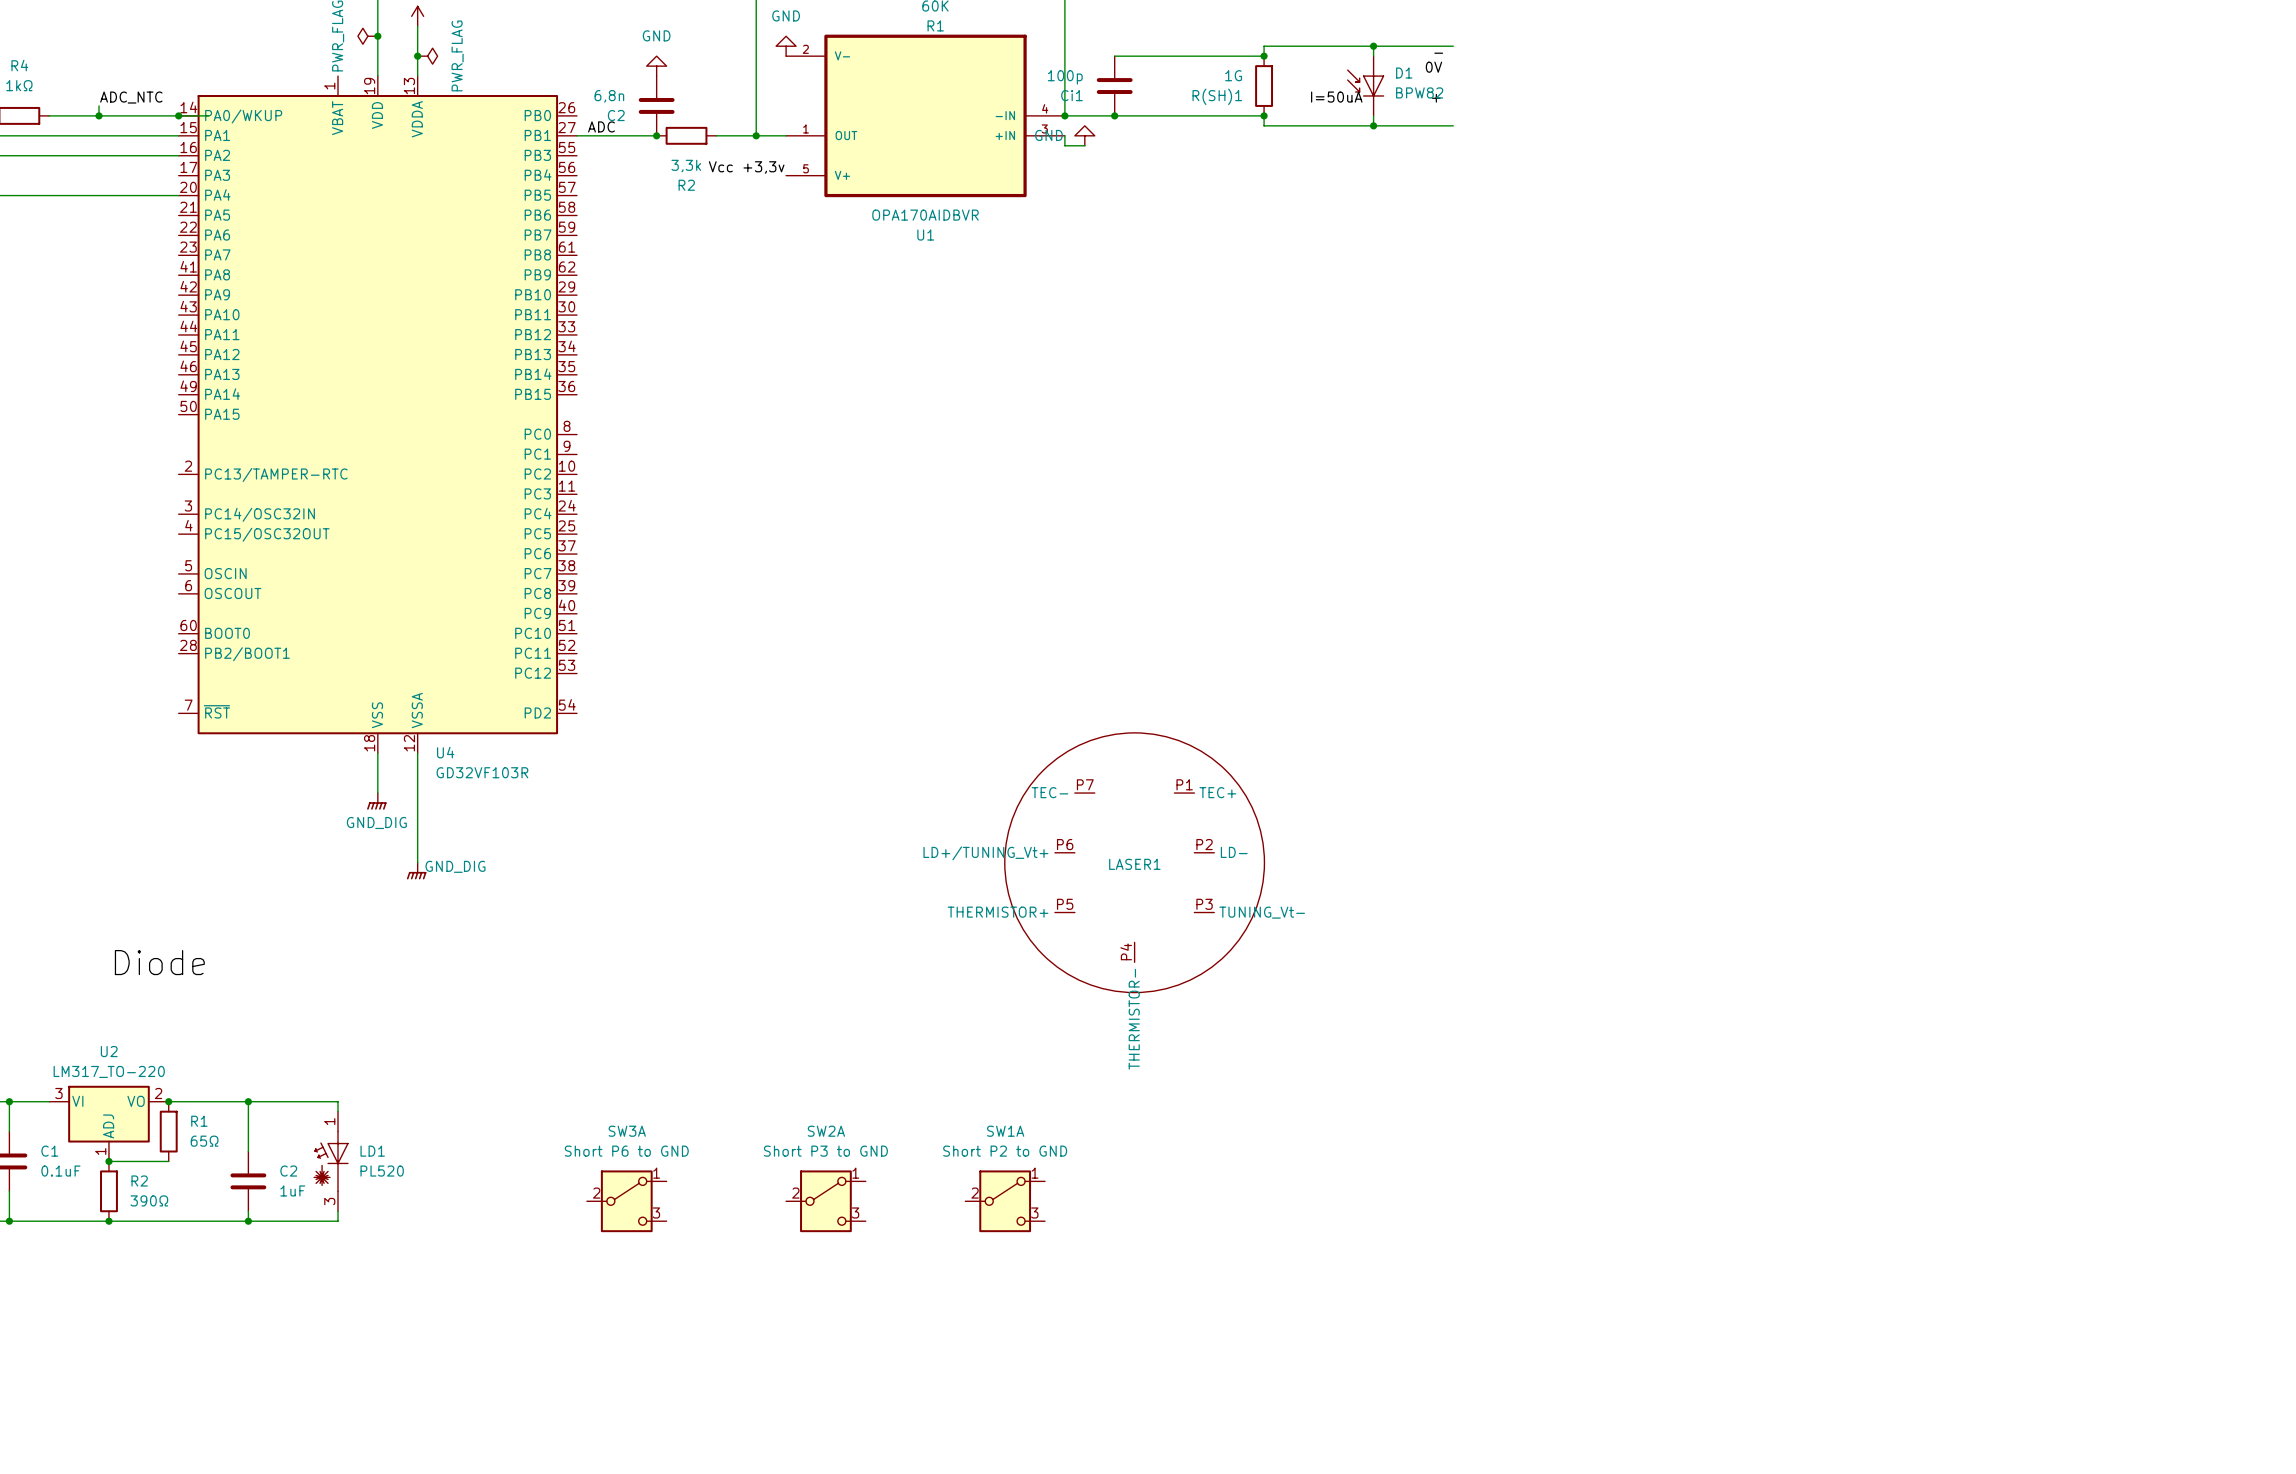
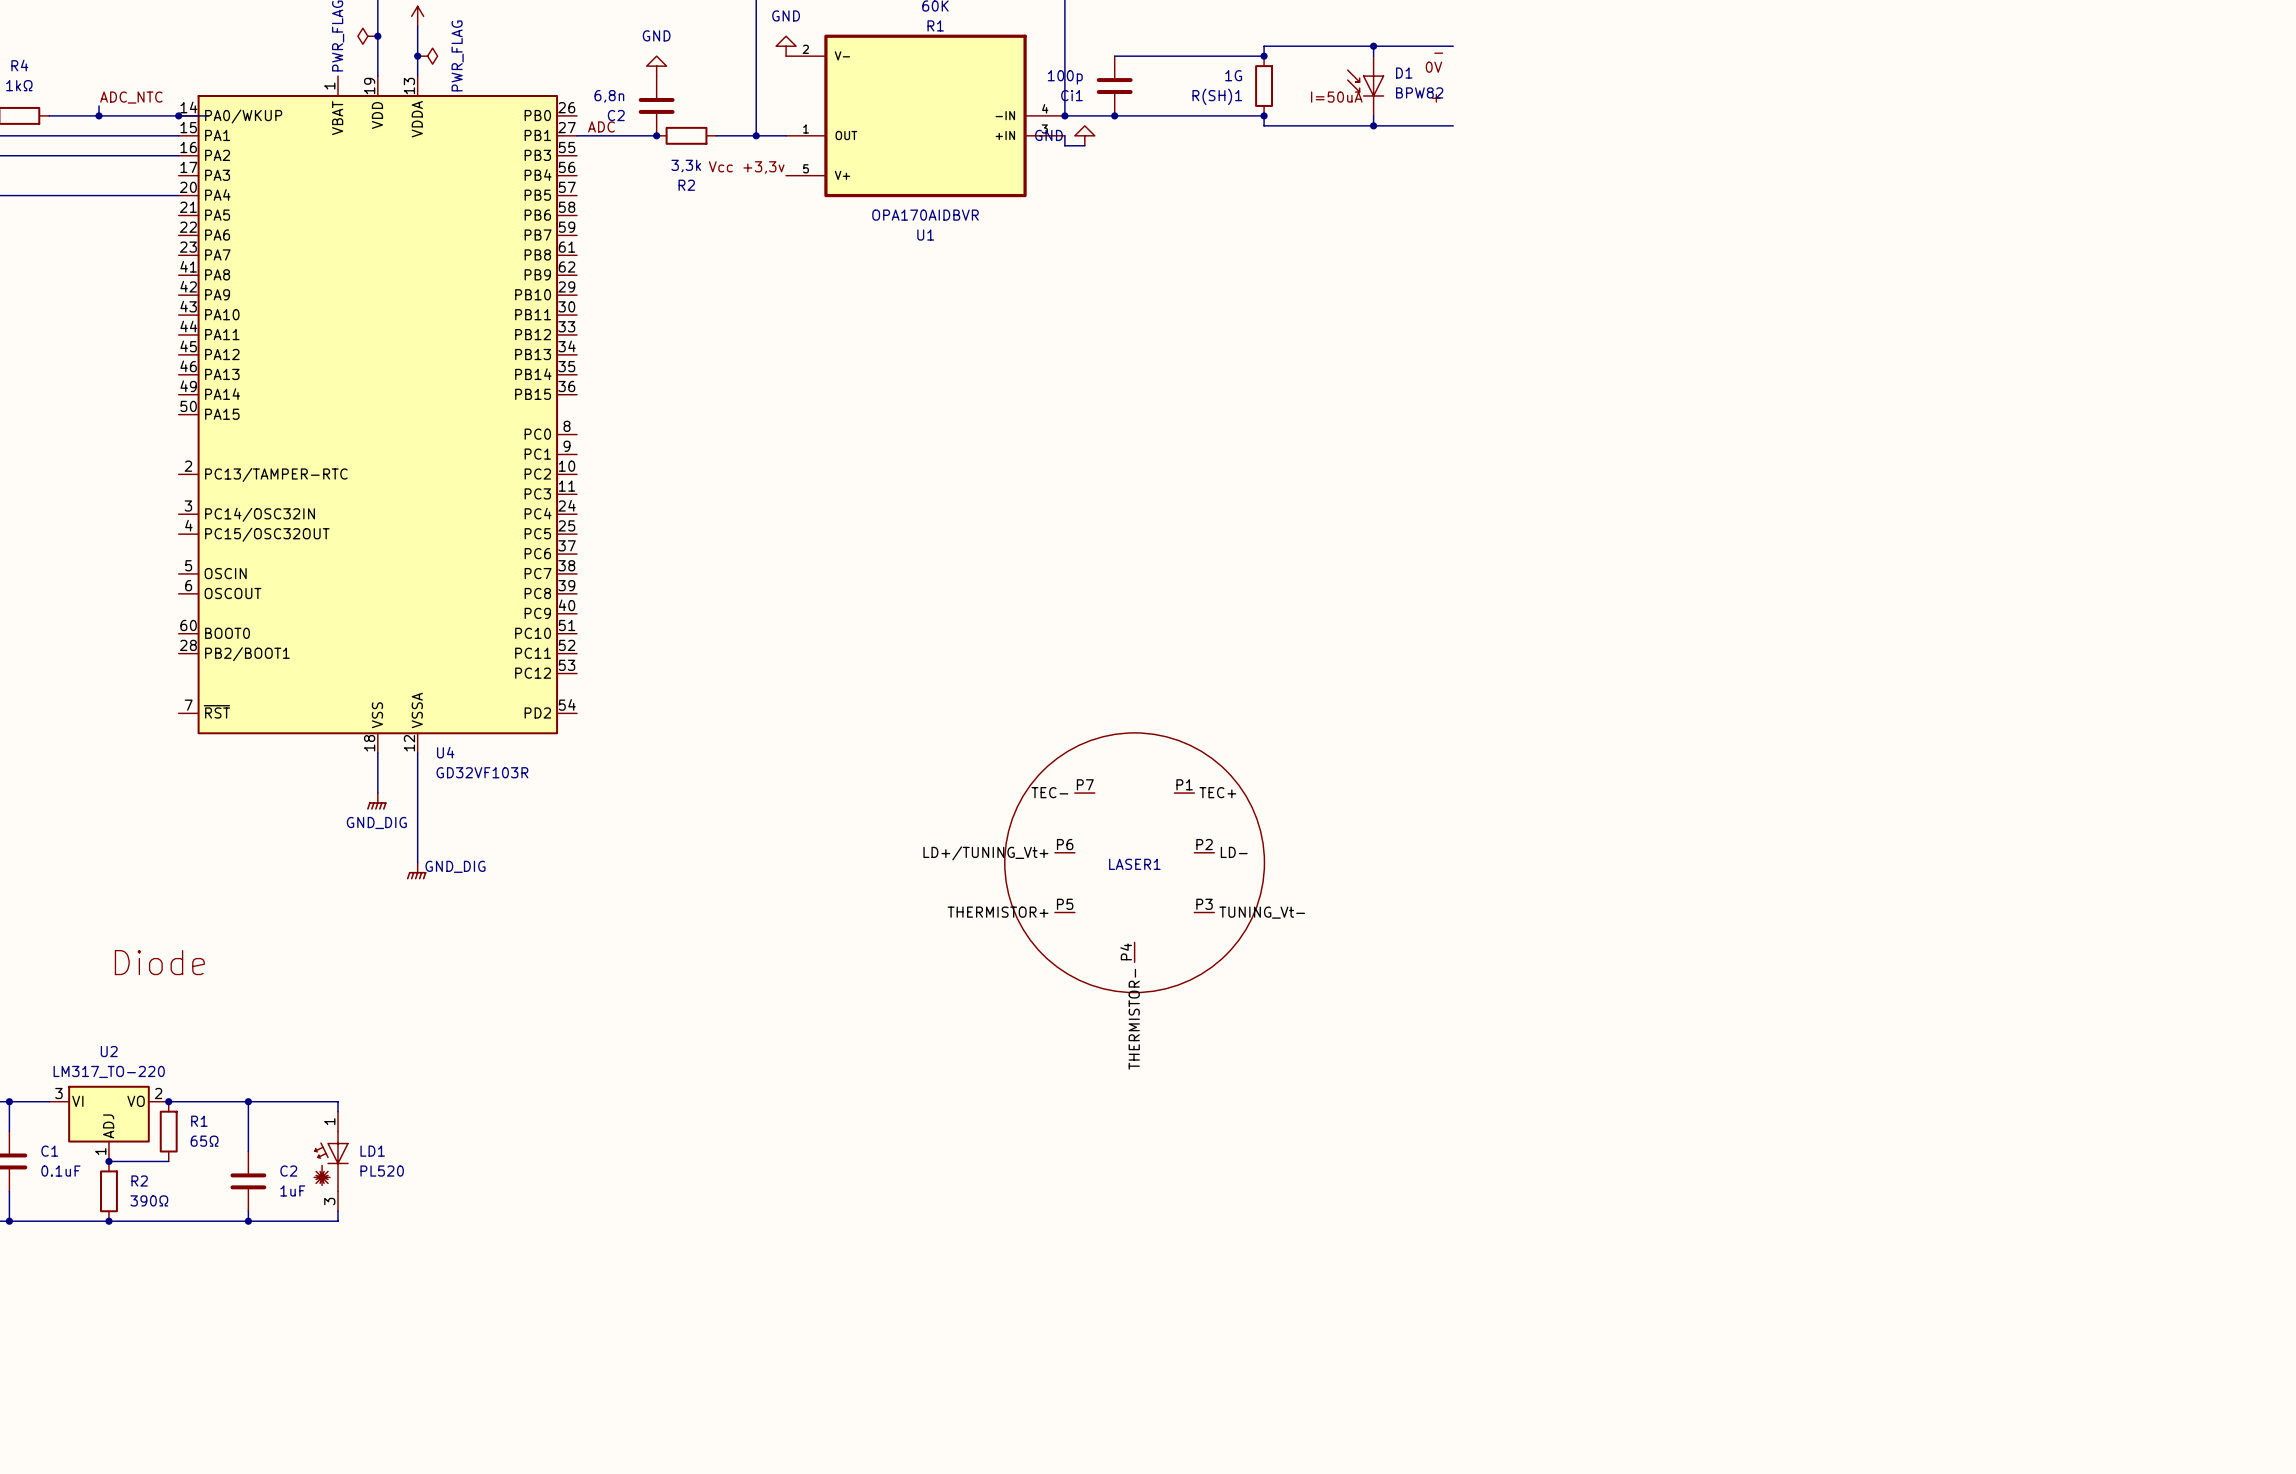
SW3A: Short P6 to GND (626, 1201) -> none
SW2A: Short P3 to GND (825, 1201) -> none
SW1A: Short P2 to GND (1005, 1201) -> none

